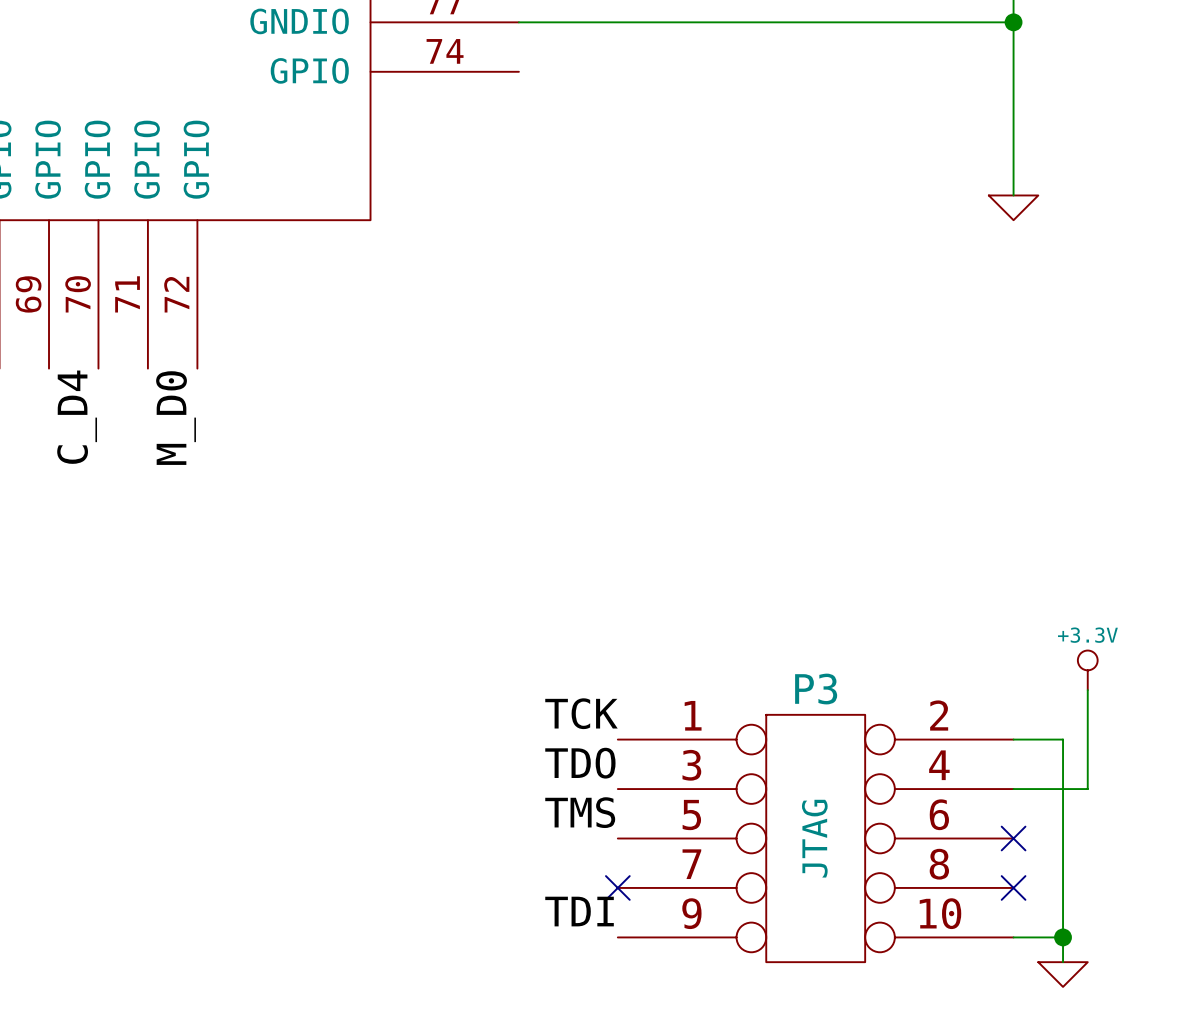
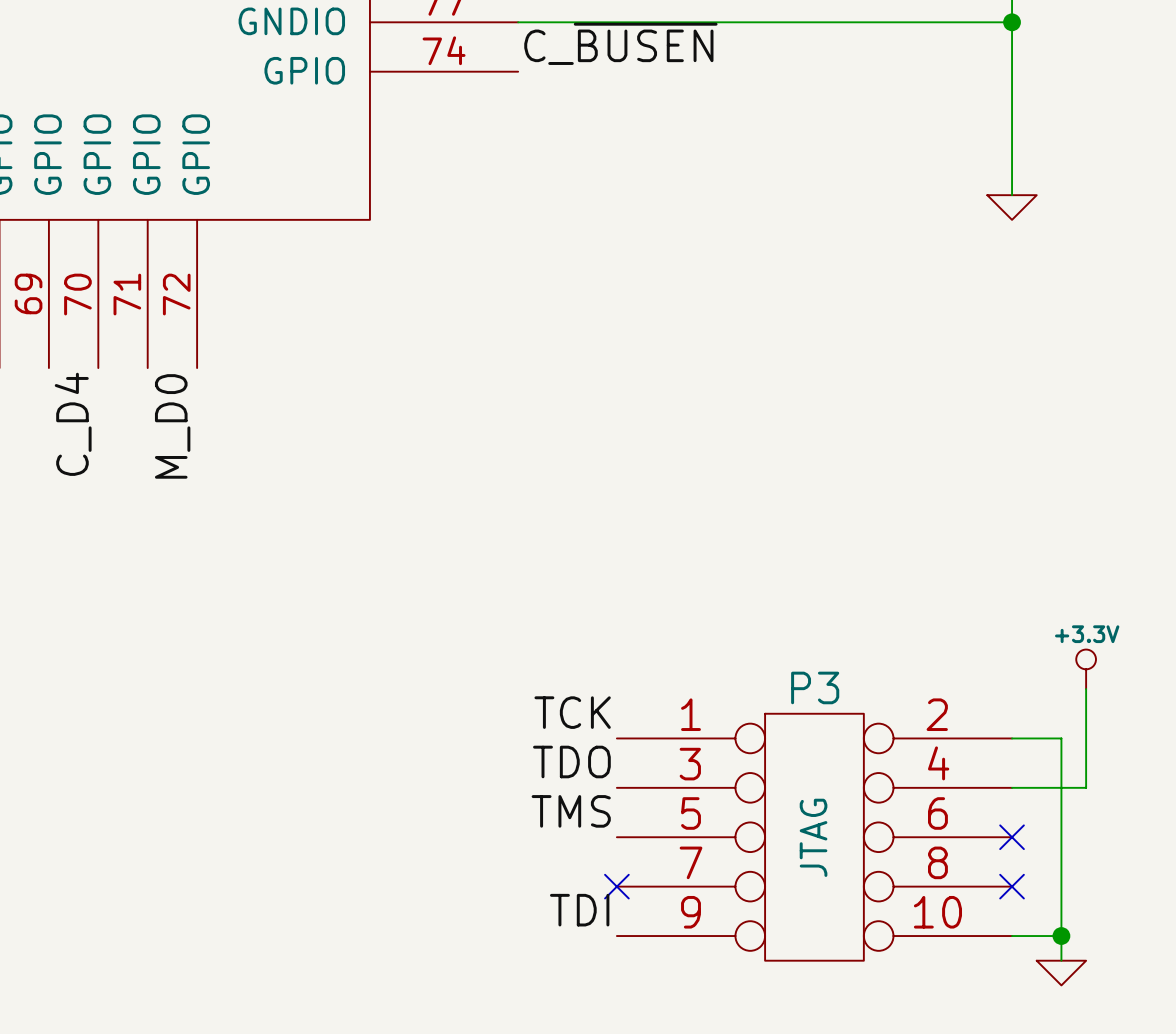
label: none -> C_~{BUSEN} (620, 43)

